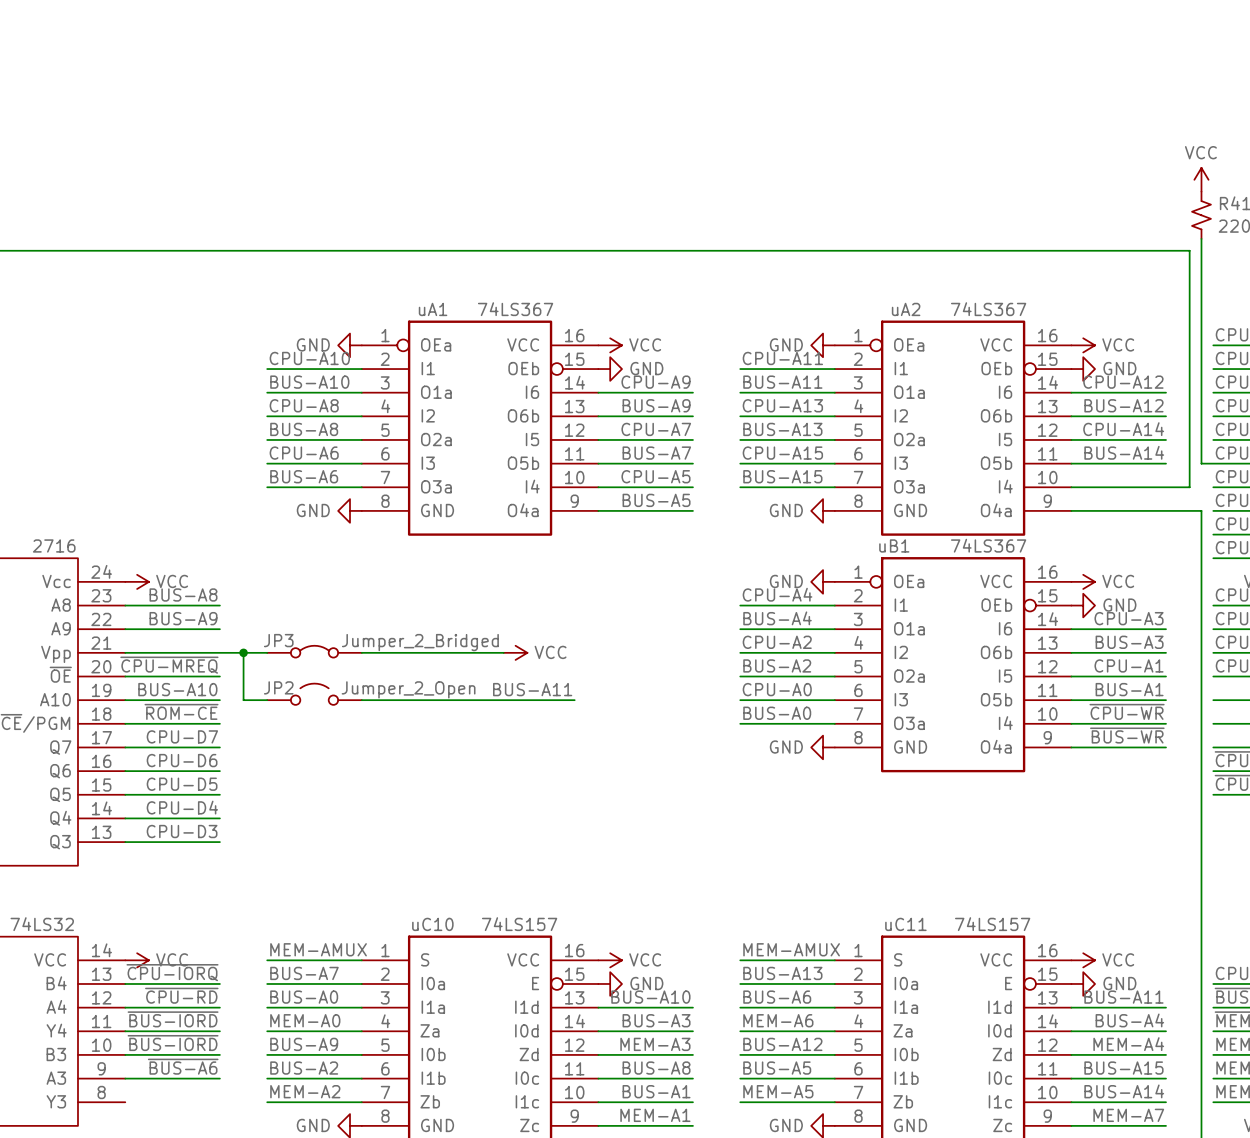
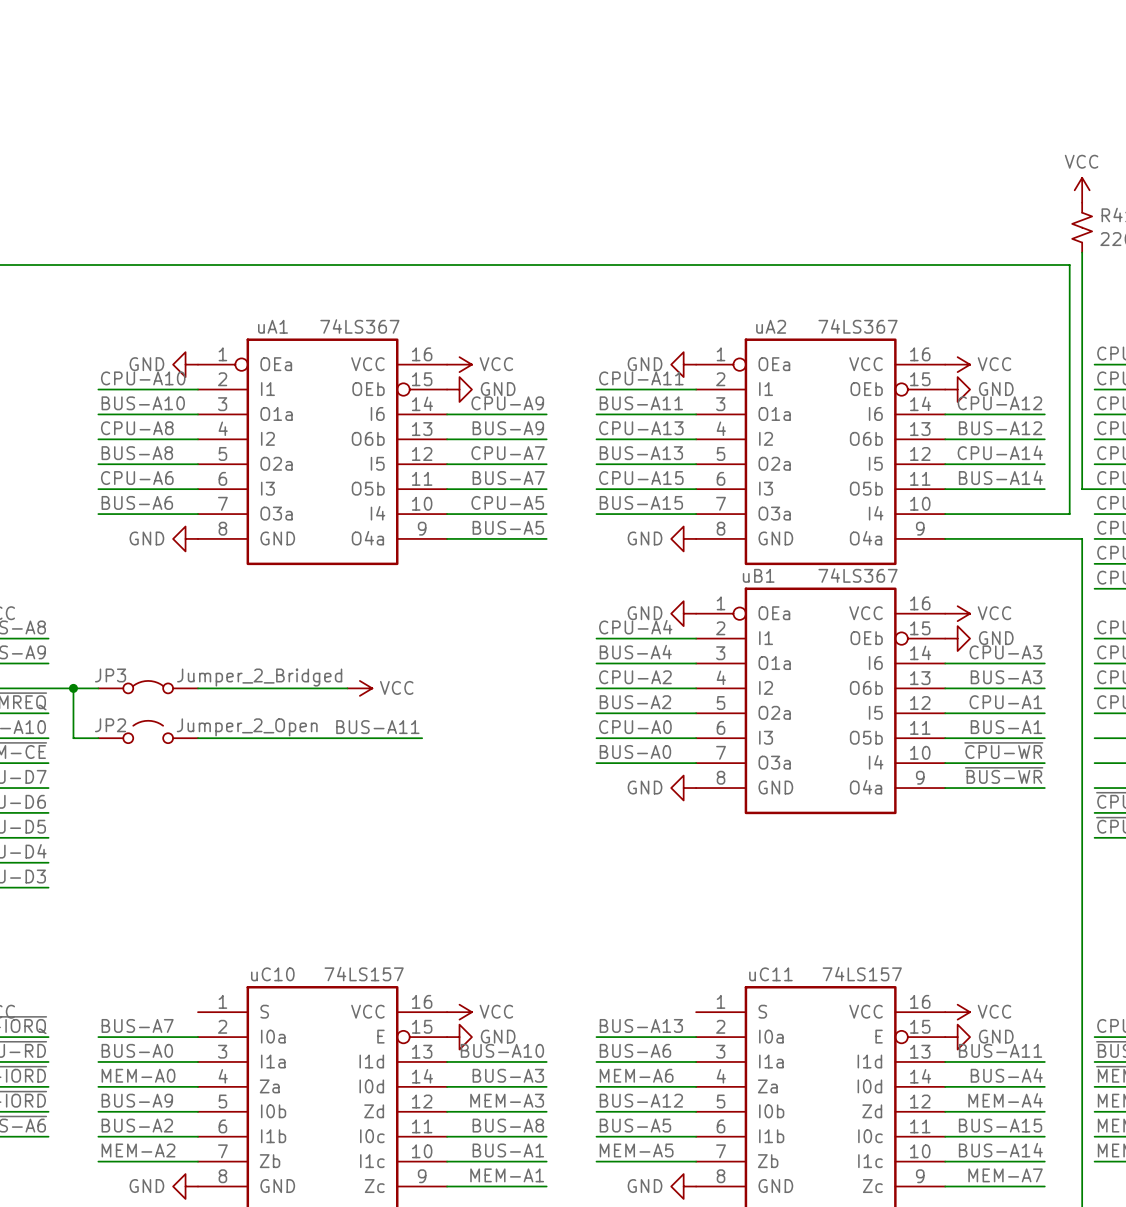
label: MEM-AMUX (318, 949) -> none
label: MEM-AMUX (791, 949) -> none
wire: (267, 960) (361, 960) -> none
wire: (740, 960) (834, 960) -> none

